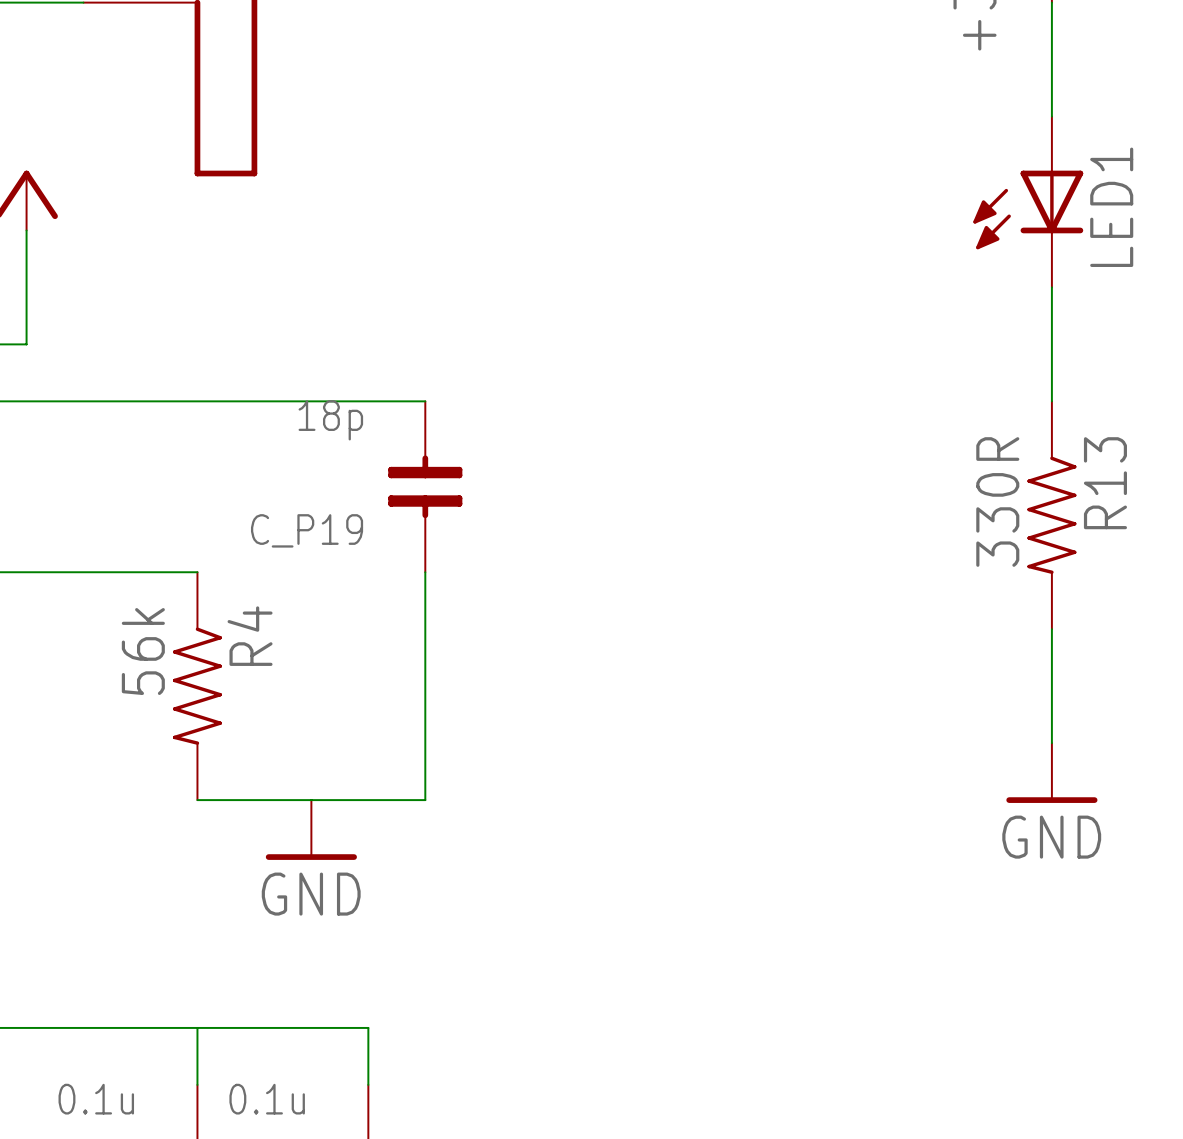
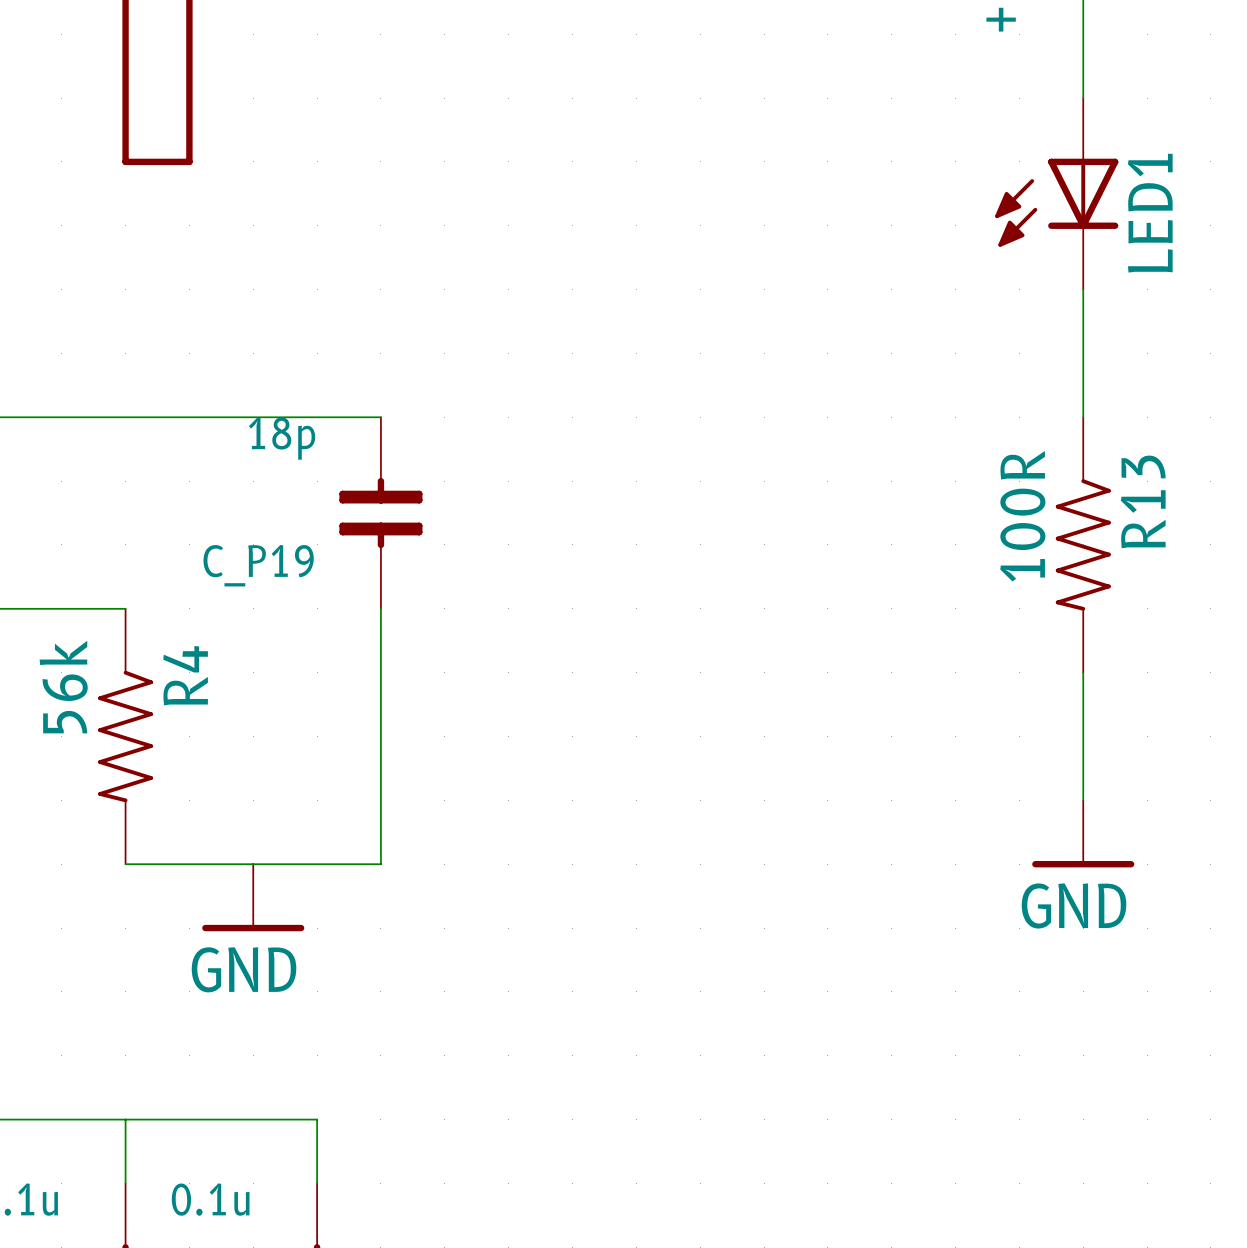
R13 value: 330R (997, 502) -> 100R (1022, 516)

